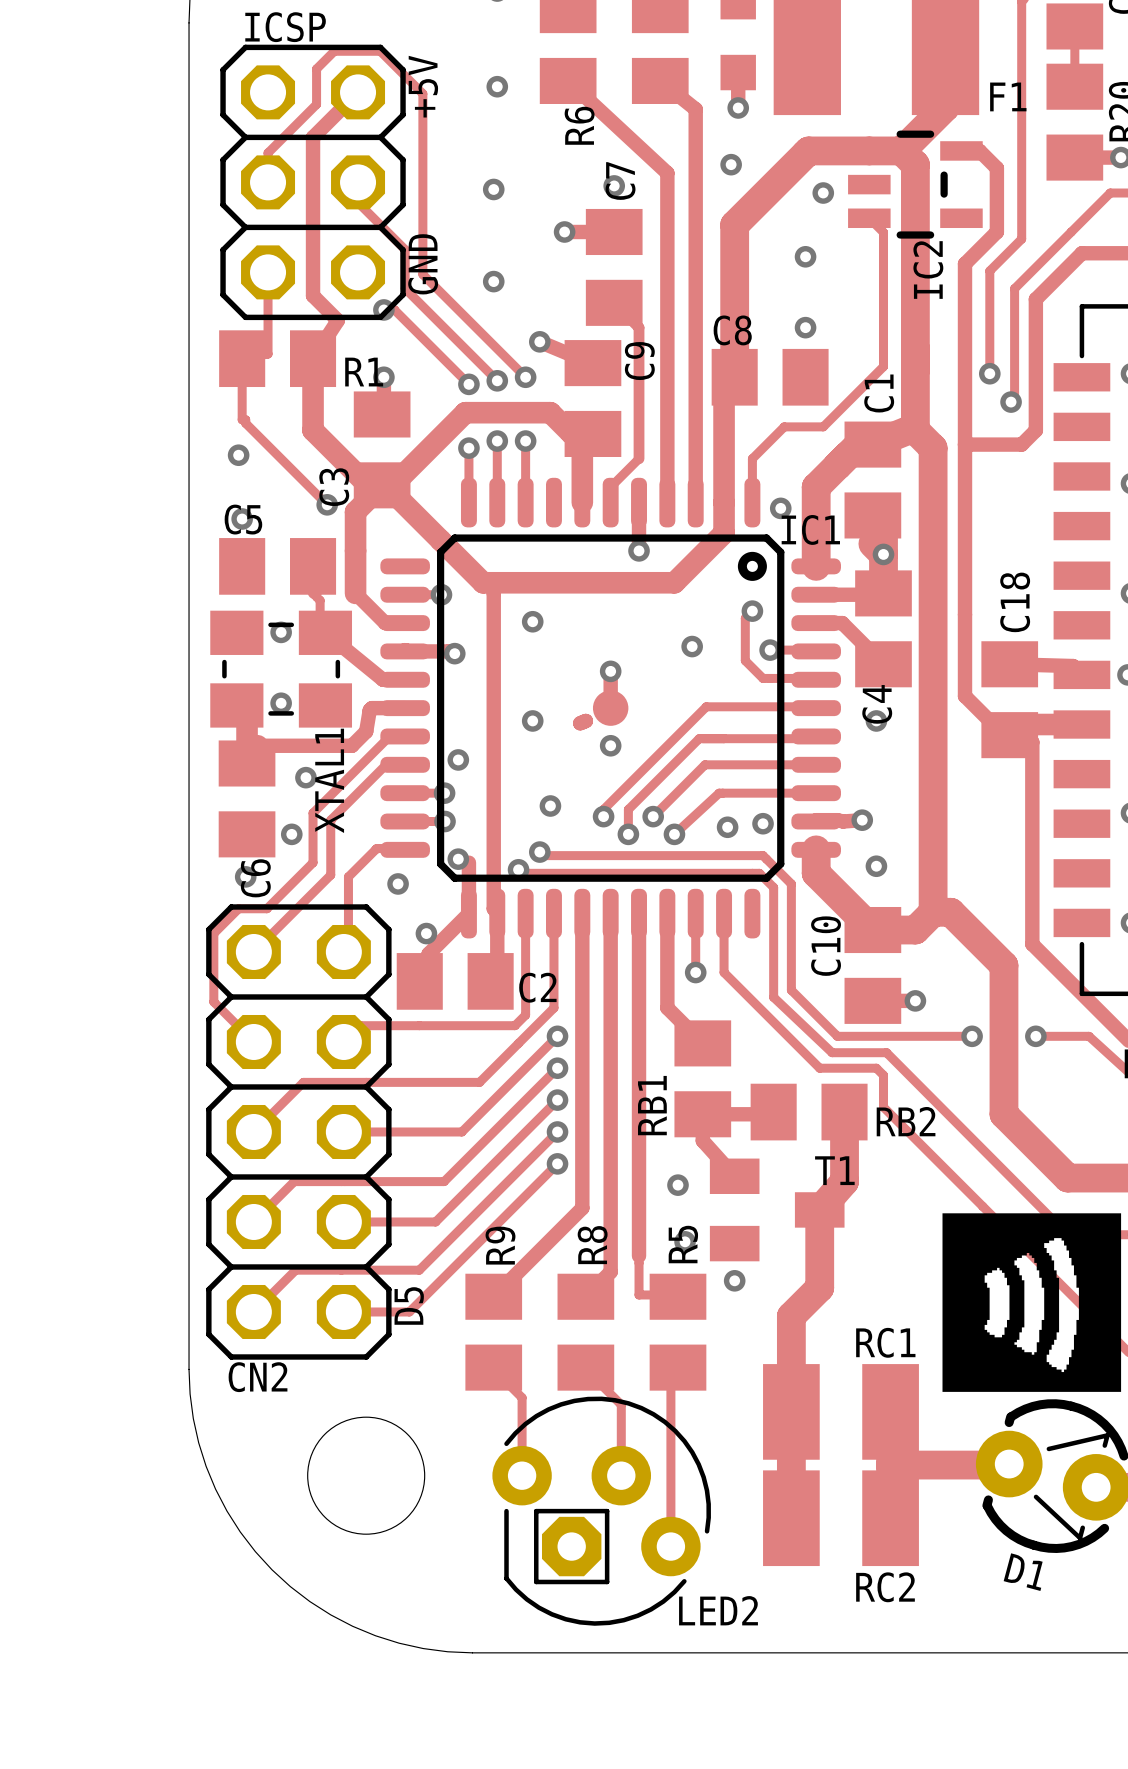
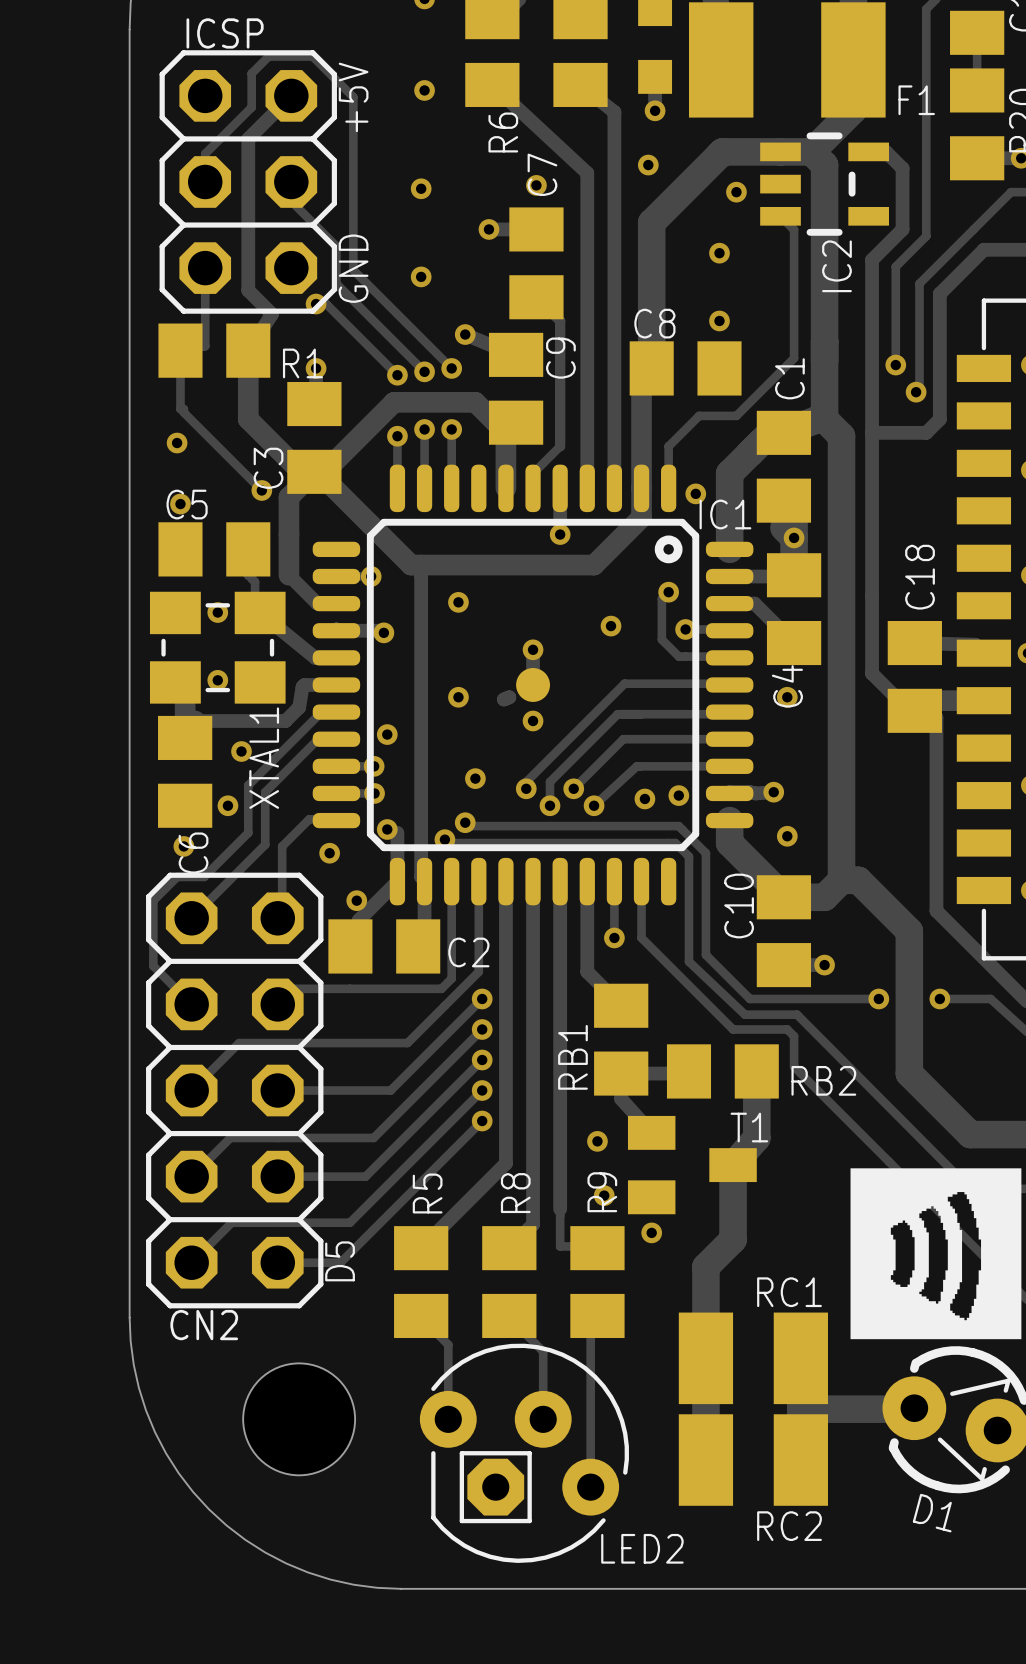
R5 name: R5 (683, 1244) -> R9 (602, 1192)
R9 name: R9 (500, 1245) -> R5 (427, 1193)

